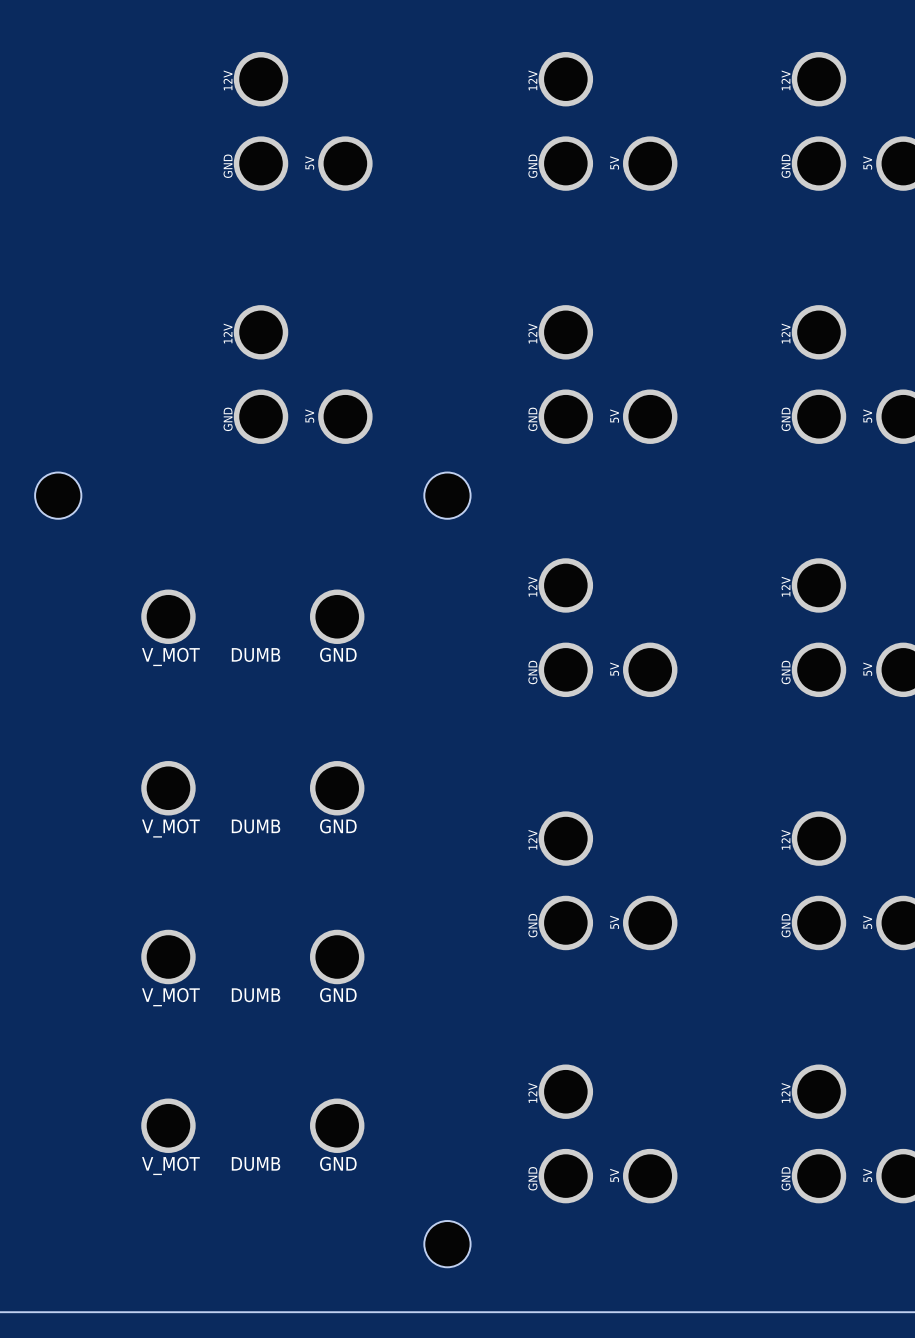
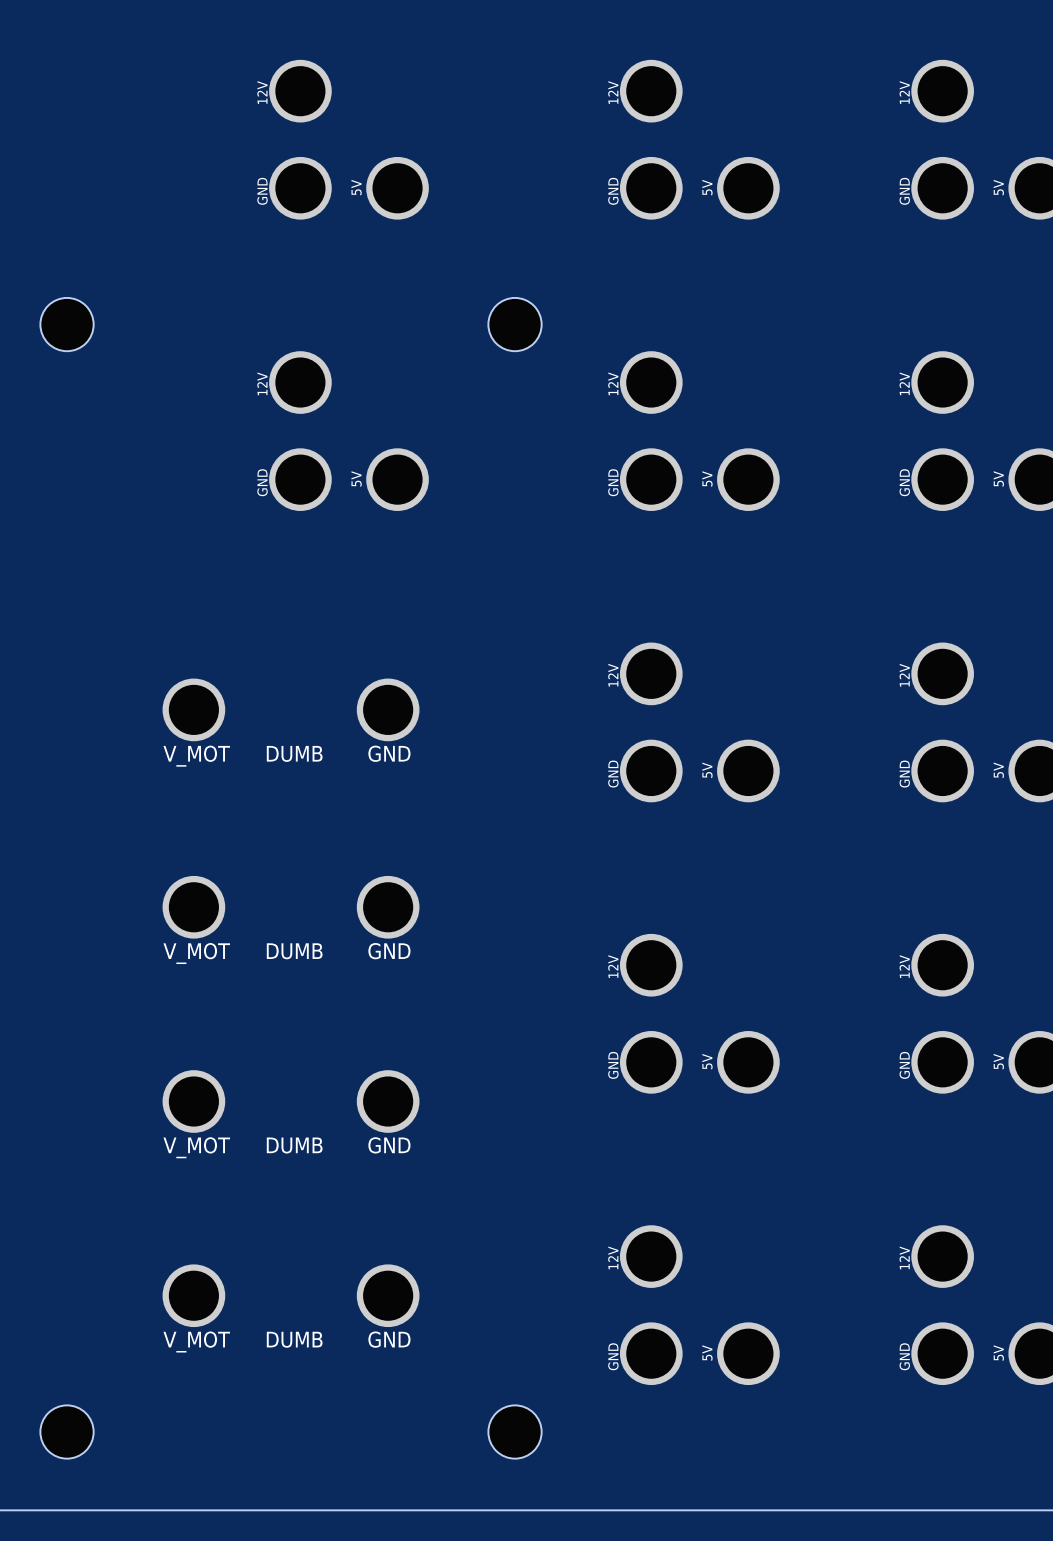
hole position: (58, 495) -> (67, 324)
hole position: (447, 495) -> (515, 324)
hole: none -> (67, 1432)

